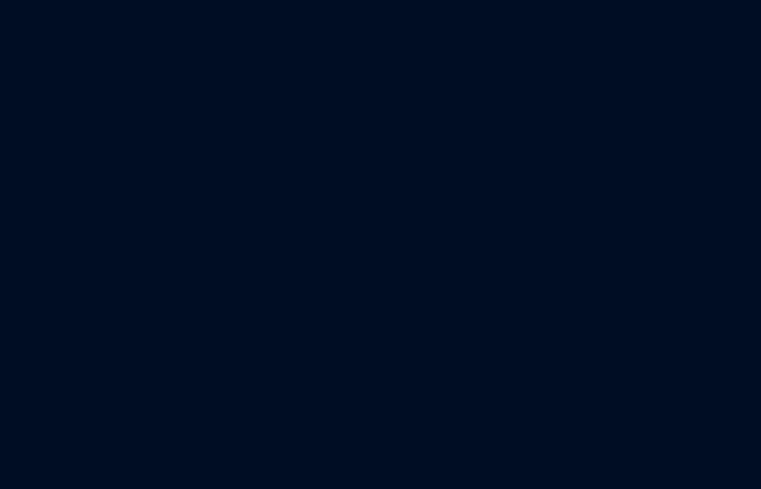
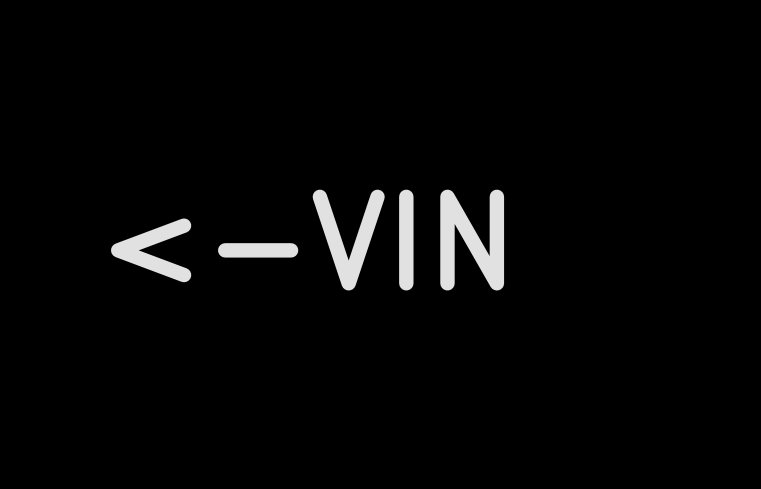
text: none -> <-VIN (307, 240)

